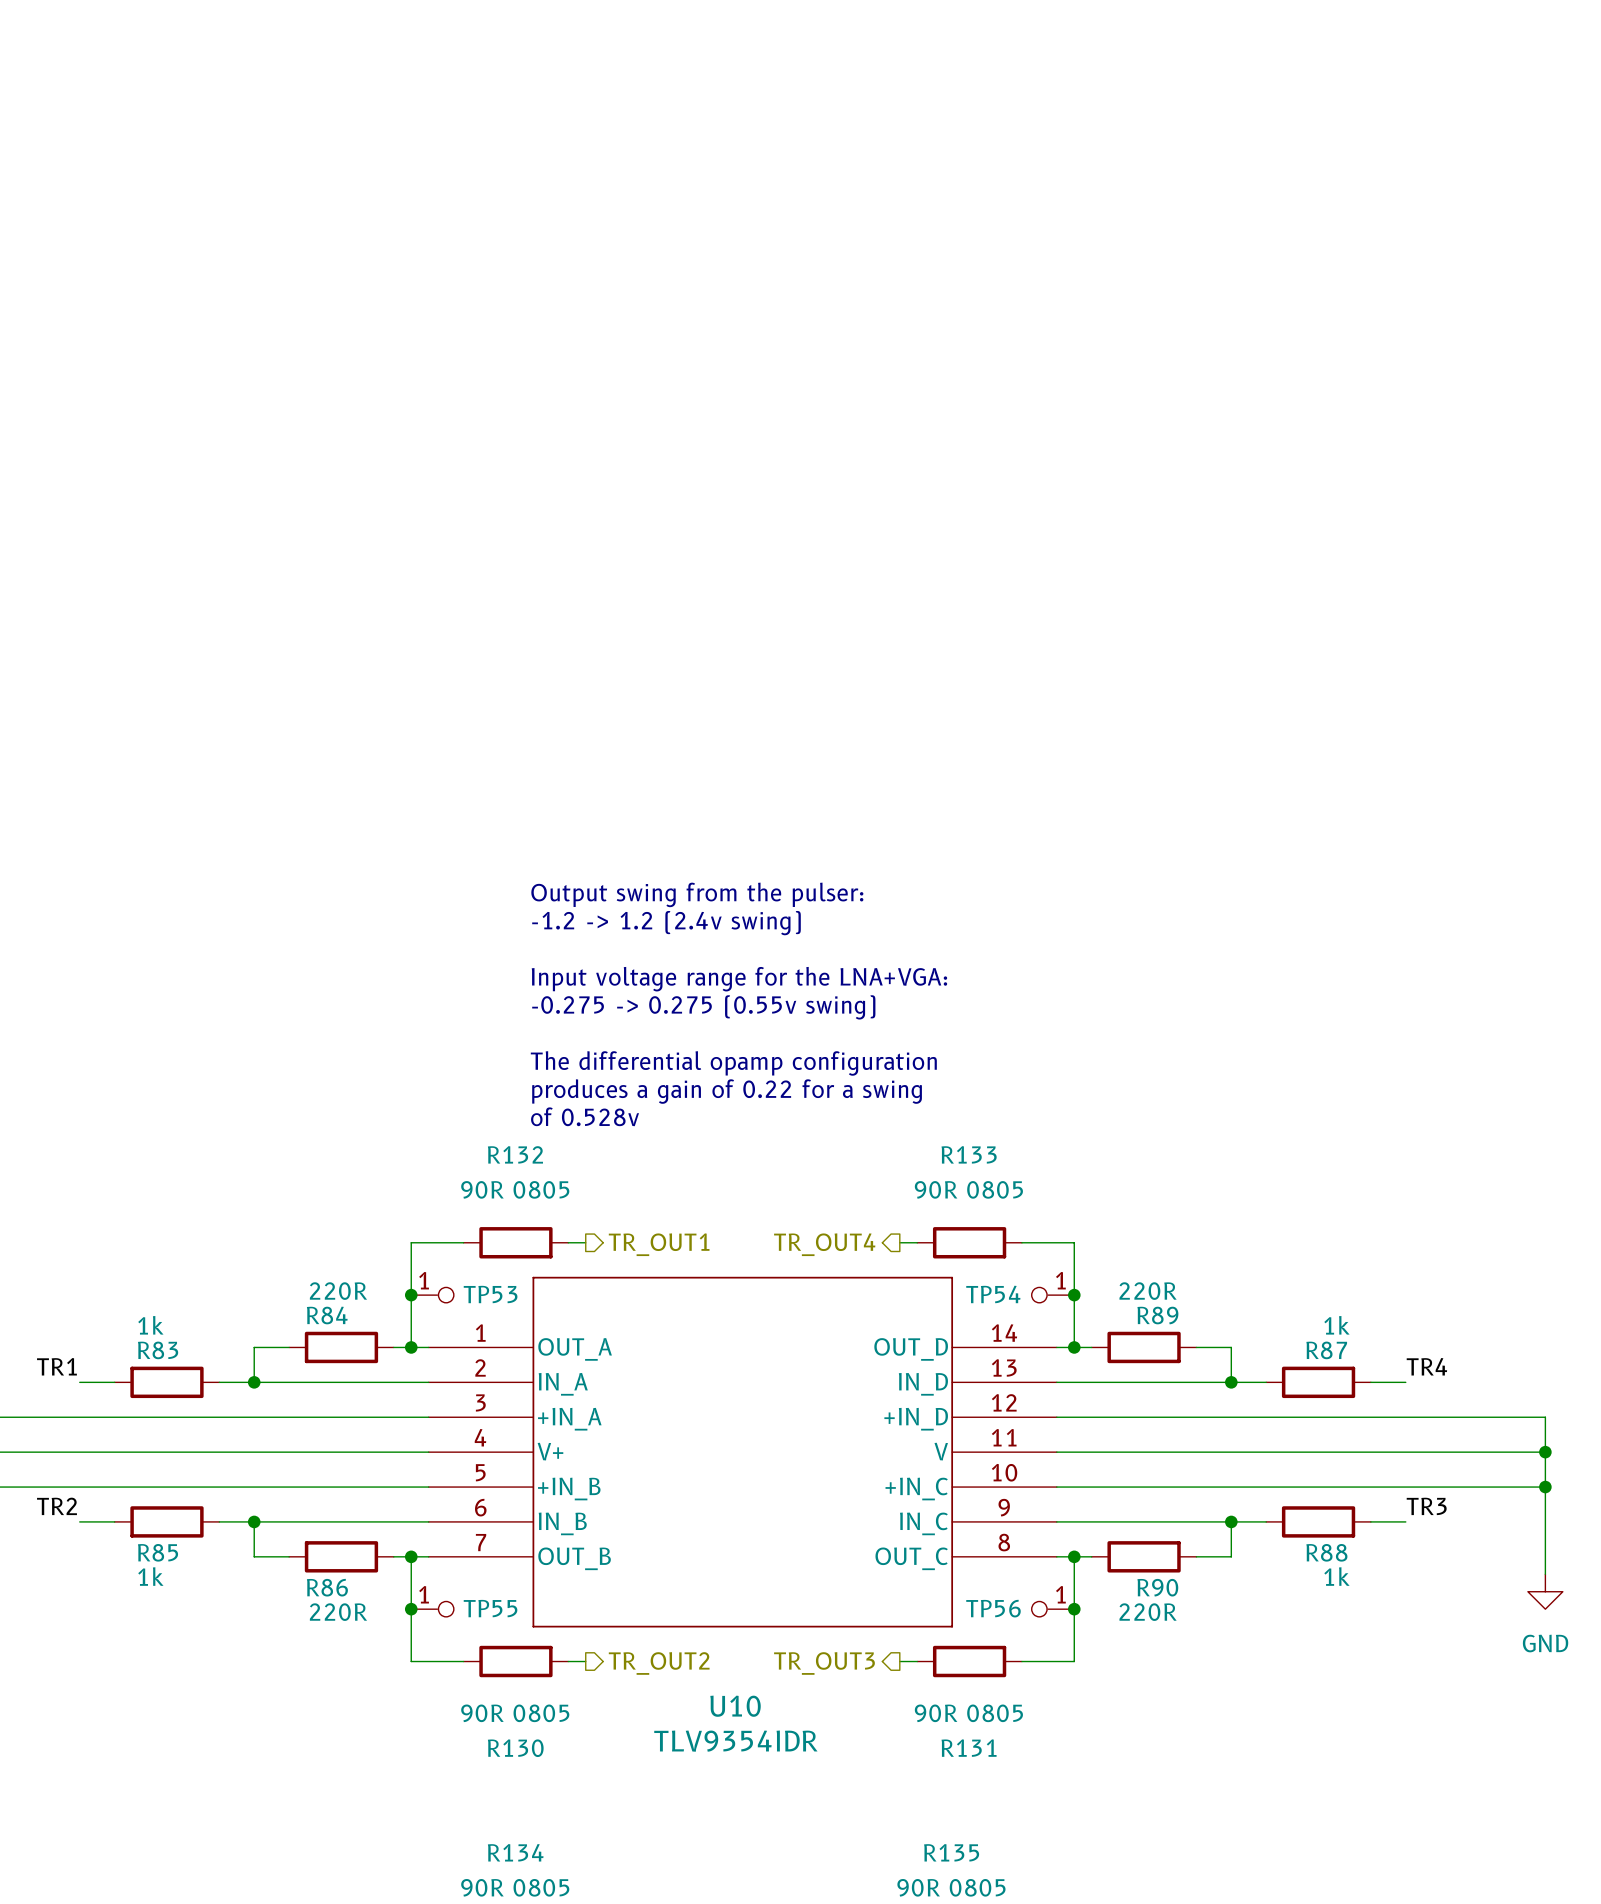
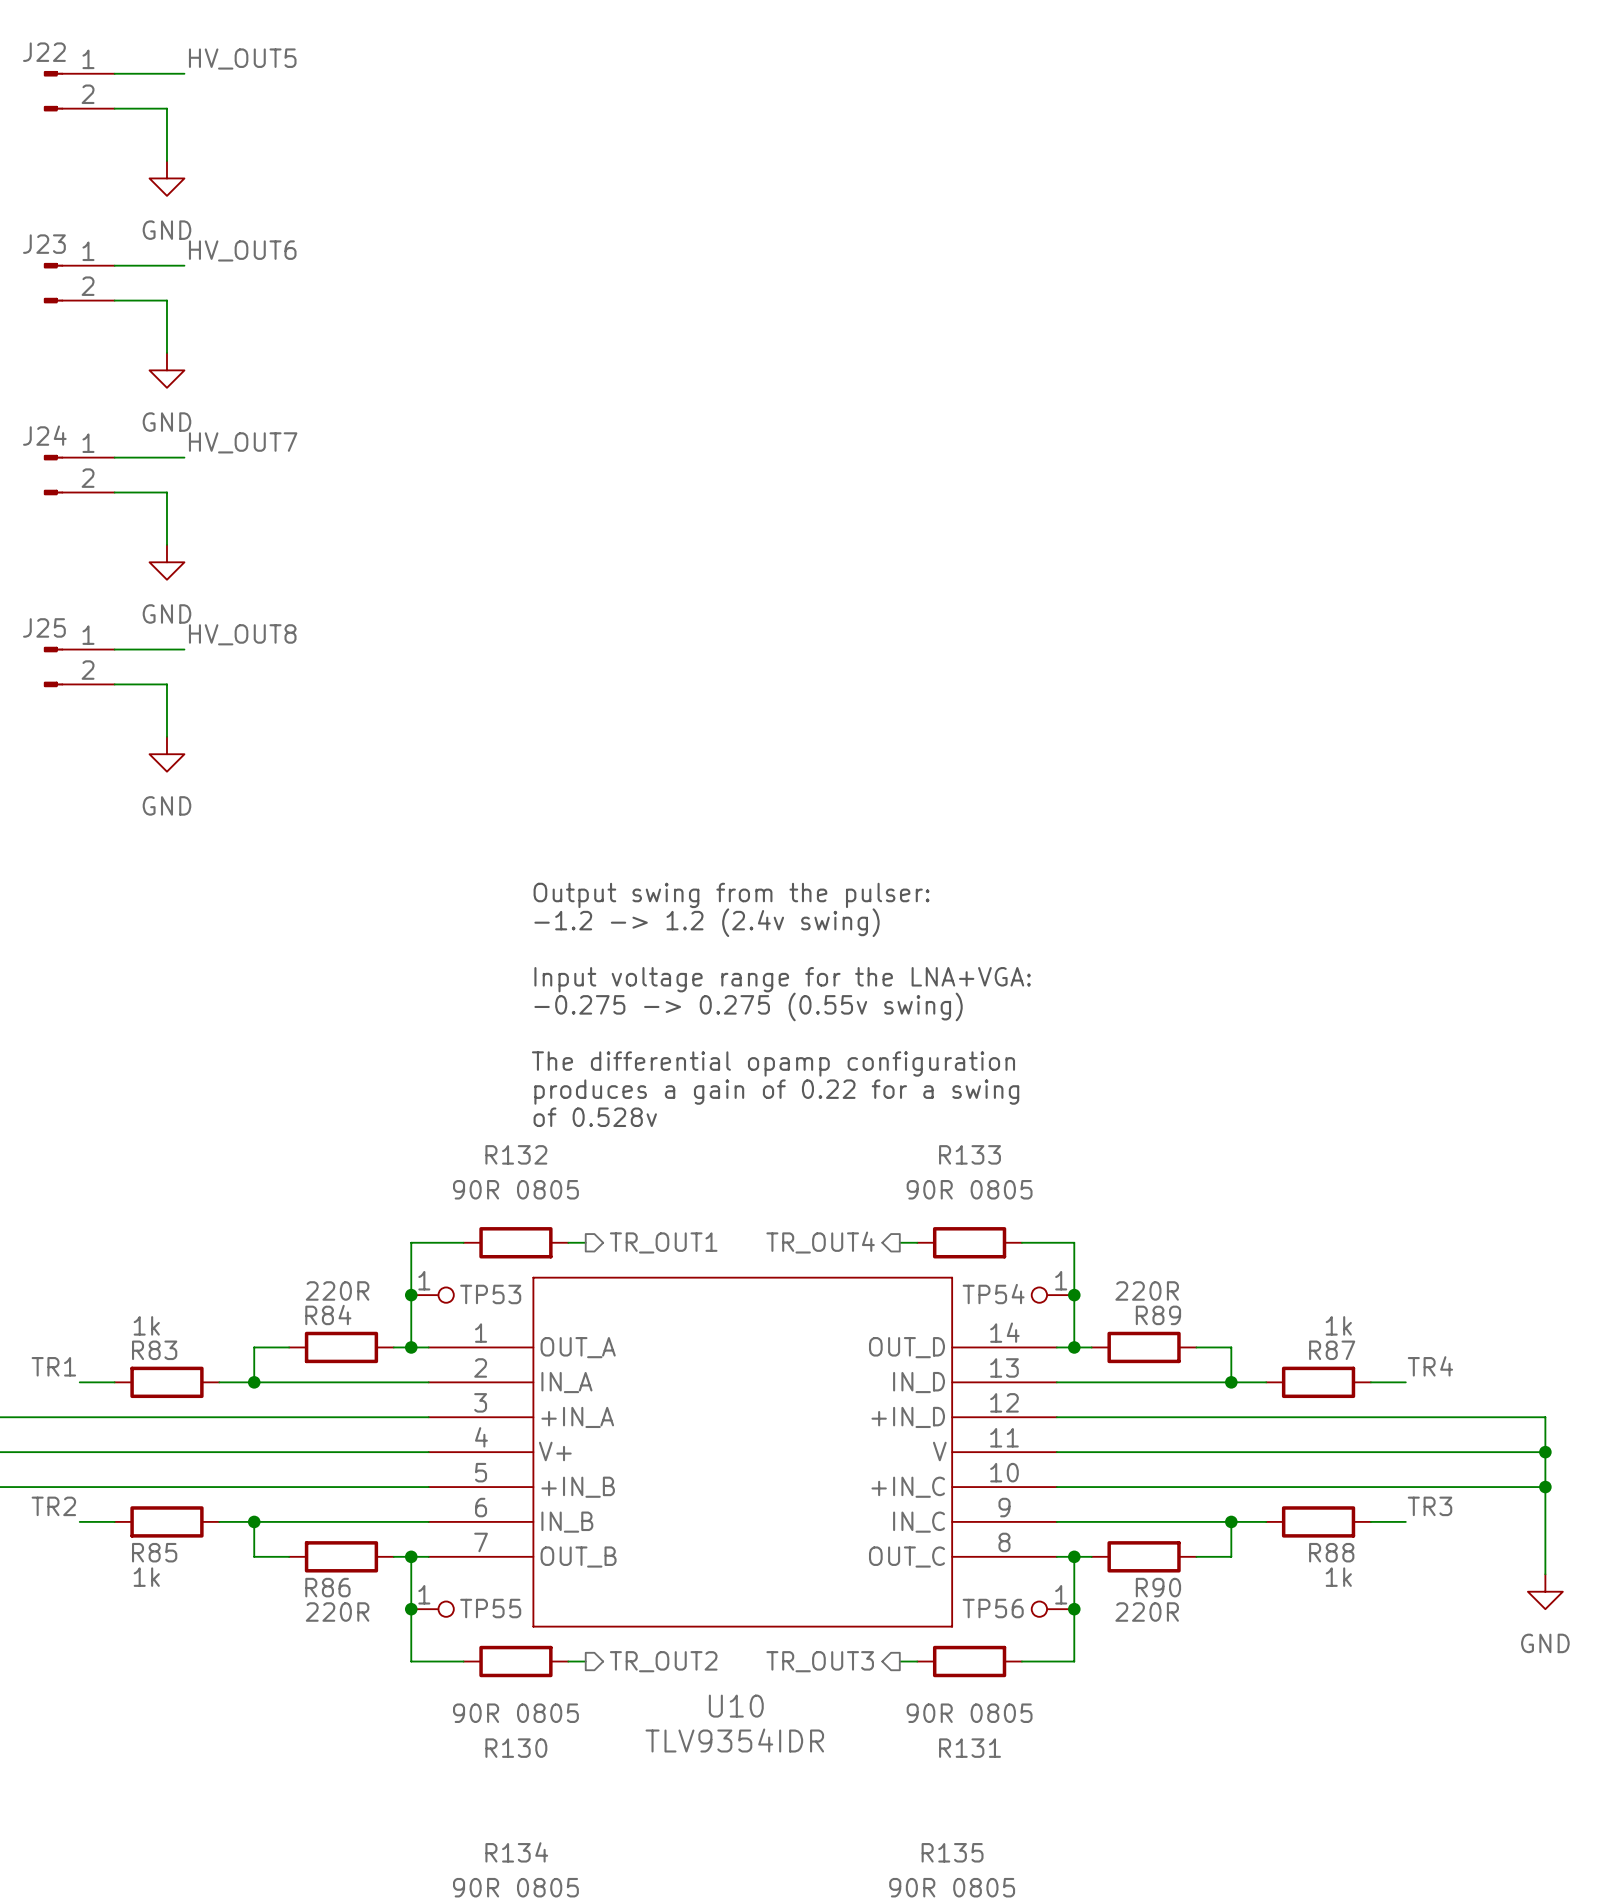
label: none -> HV_OUT5 (242, 59)
wire: none -> (114, 73) (184, 73)
J22: none -> (79, 91)
wire: none -> (114, 108) (166, 108) (166, 160)
power symbol: none -> GND (166, 178)
label: none -> HV_OUT6 (242, 250)
wire: none -> (114, 265) (184, 265)
J23: none -> (79, 283)
wire: none -> (114, 300) (166, 300) (166, 352)
power symbol: none -> GND (166, 370)
label: none -> HV_OUT7 (243, 442)
wire: none -> (114, 457) (184, 457)
J24: none -> (79, 475)
wire: none -> (114, 492) (166, 492) (166, 544)
power symbol: none -> GND (166, 562)
label: none -> HV_OUT8 (242, 634)
wire: none -> (114, 649) (184, 649)
J25: none -> (79, 666)
wire: none -> (114, 684) (166, 684) (166, 736)
power symbol: none -> GND (166, 754)

